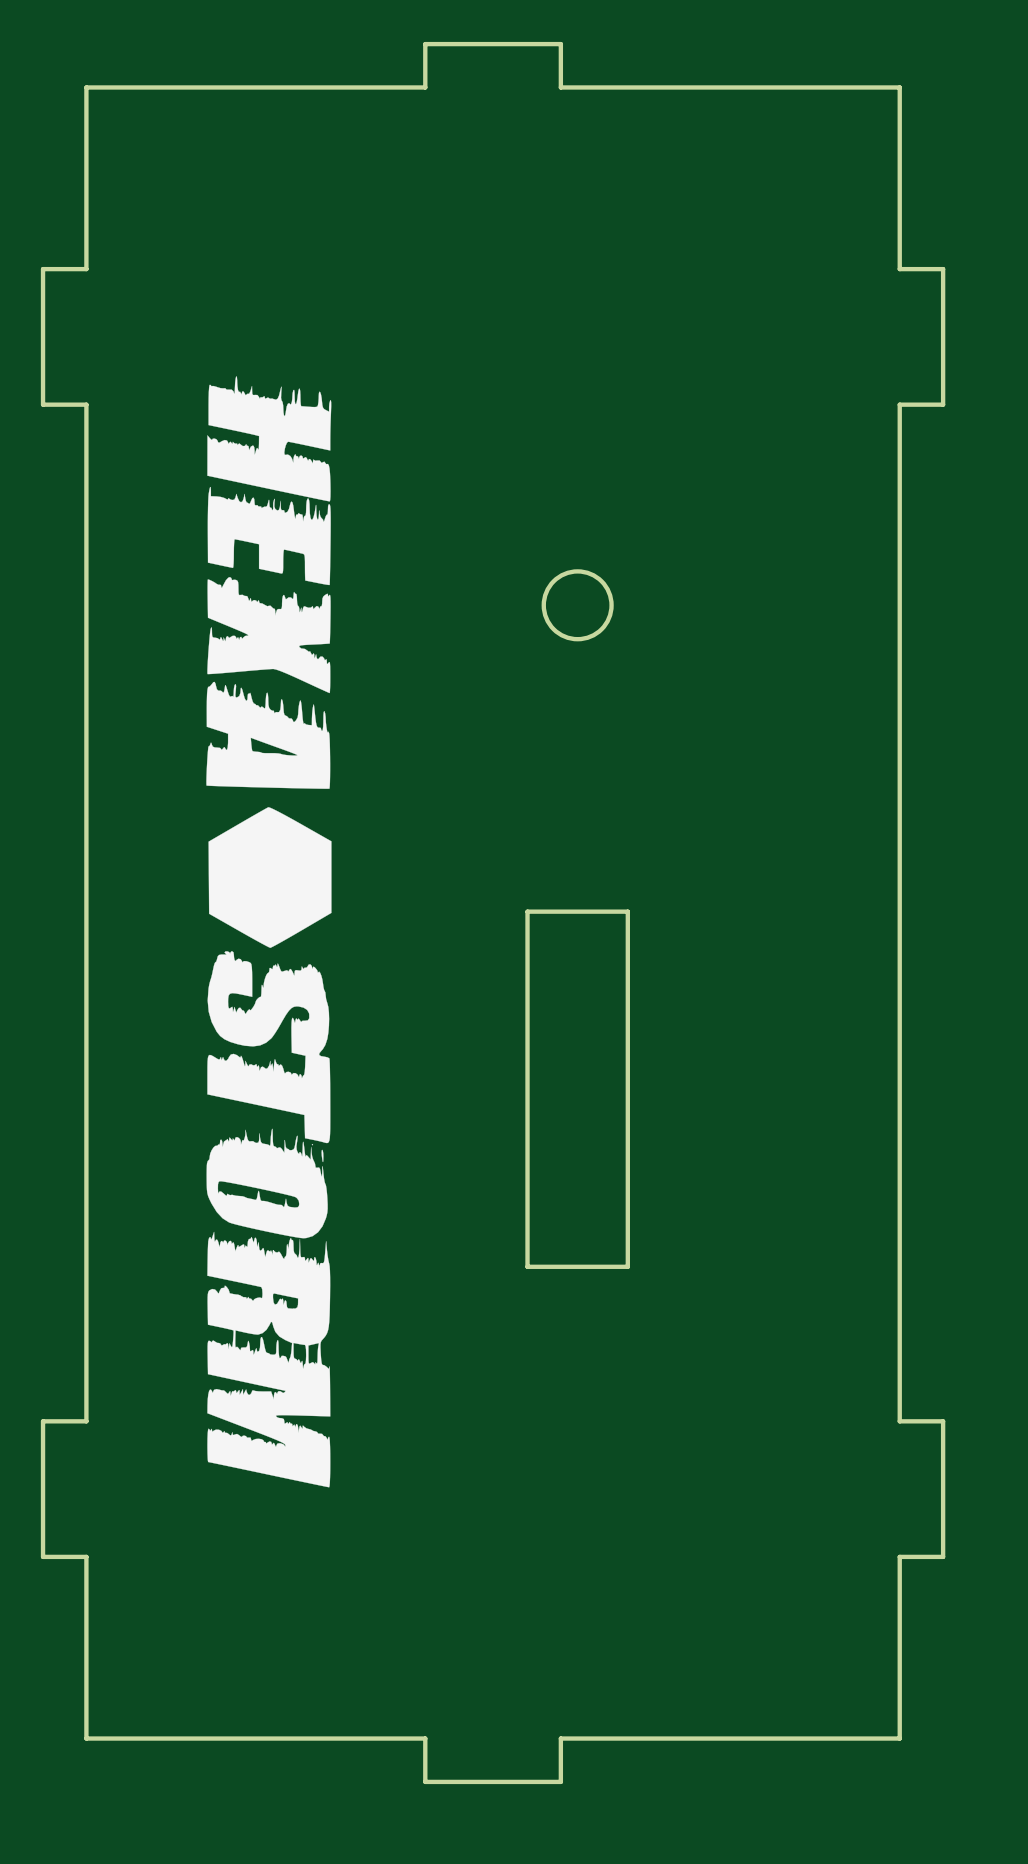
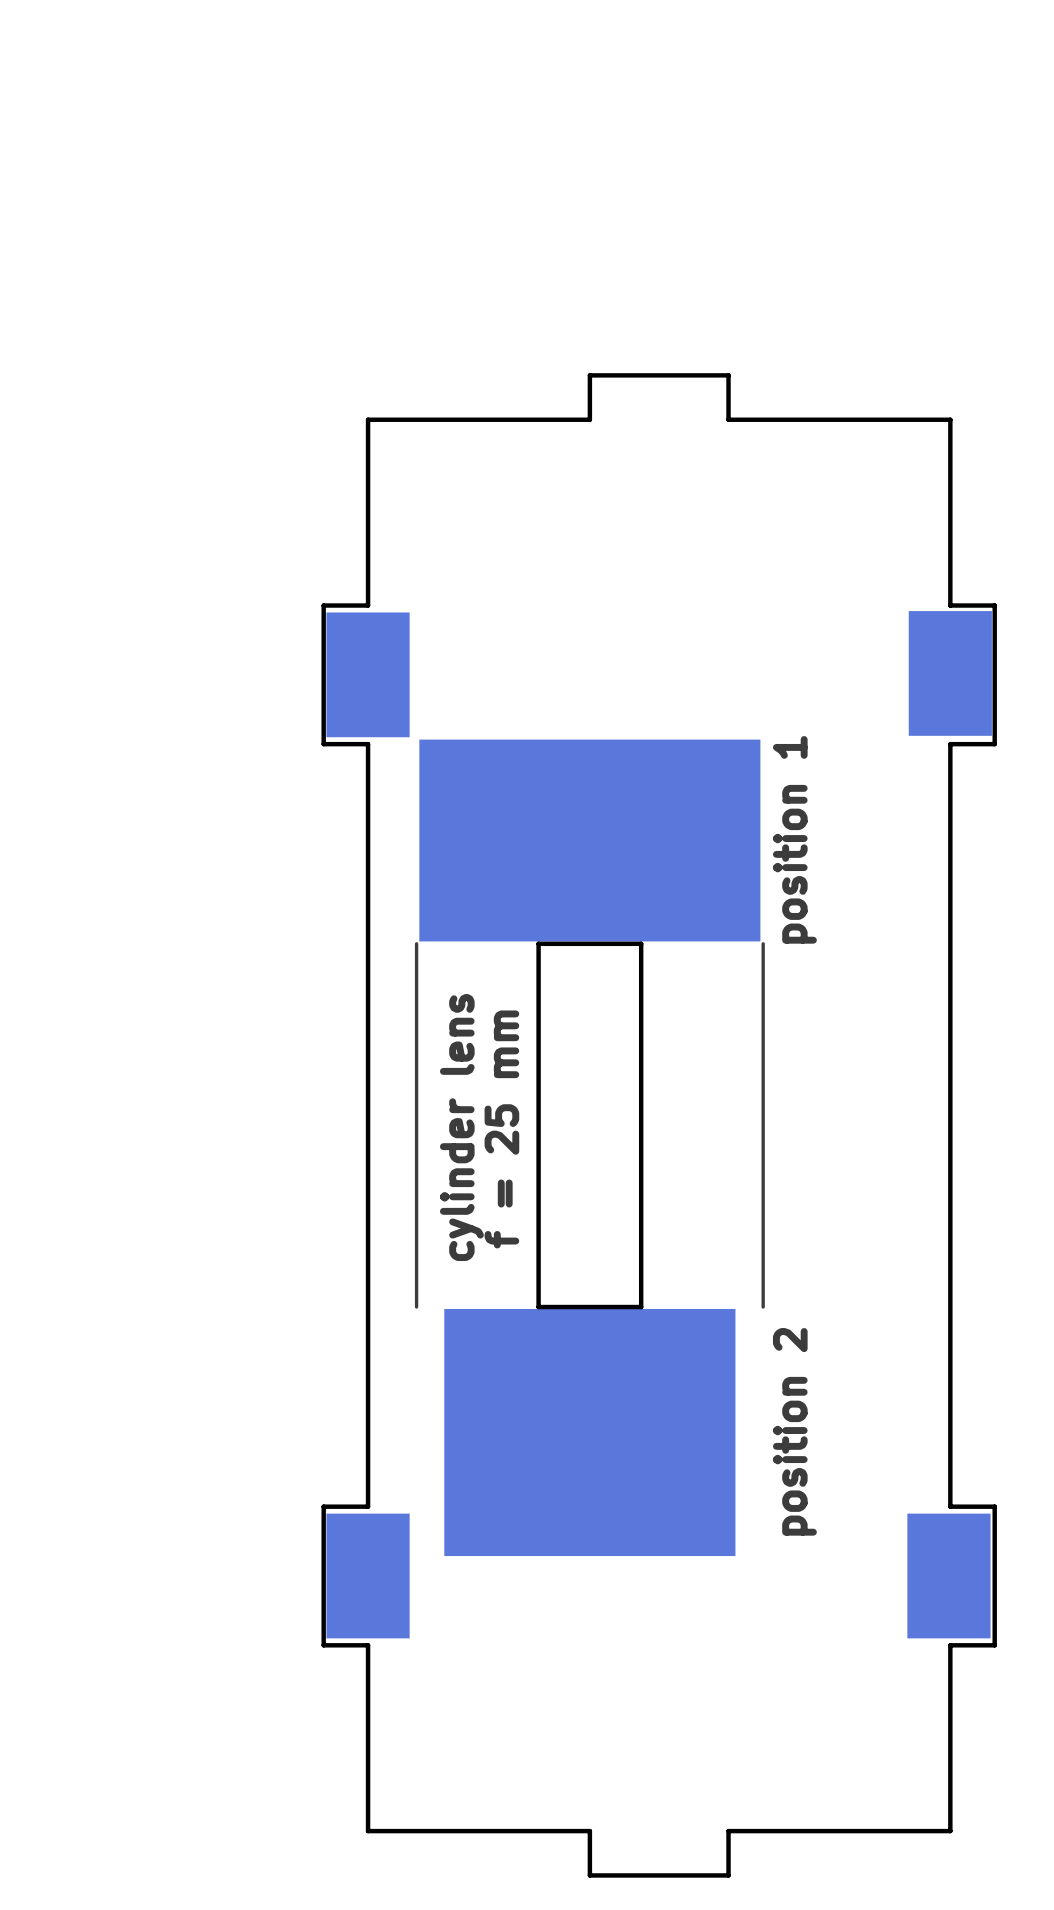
board edge: (560, 44) (560, 87) (899, 87) (899, 269) (943, 269) (943, 404) (899, 404) (899, 1421) (943, 1421) (943, 1556) (899, 1556) (899, 1738) (560, 1738) (560, 1781) (425, 1781) (425, 1738) (86, 1738) (86, 1556) (43, 1556) (43, 1421) (86, 1421) (86, 404) (43, 404) (43, 269) (86, 269) (86, 87) (425, 87) (425, 44) (560, 44) -> (728, 375) (728, 419) (950, 419) (950, 605) (994, 605) (994, 744) (950, 744) (950, 1506) (994, 1506) (994, 1645) (950, 1645) (950, 1831) (728, 1831) (728, 1875) (589, 1875) (589, 1831) (368, 1831) (368, 1645) (323, 1645) (323, 1506) (368, 1506) (368, 744) (323, 744) (323, 605) (368, 605) (368, 419) (589, 419) (589, 375) (728, 375)
drawing: [206, 376, 332, 1488] -> none
round board edge: [541, 569, 614, 642] -> none
part: none -> (950, 673)
part: none -> (368, 674)
part: none -> (589, 840)
text: none -> position 1 (794, 839)
line: none -> (416, 943) (416, 1307)
line: none -> (763, 943) (763, 1307)
text: none -> cylinder lens (461, 1127)
text: none -> f = 25 mm (501, 1129)
text: none -> position 2 (794, 1431)
part: none -> (589, 1432)
part: none -> (368, 1575)
part: none -> (948, 1575)

